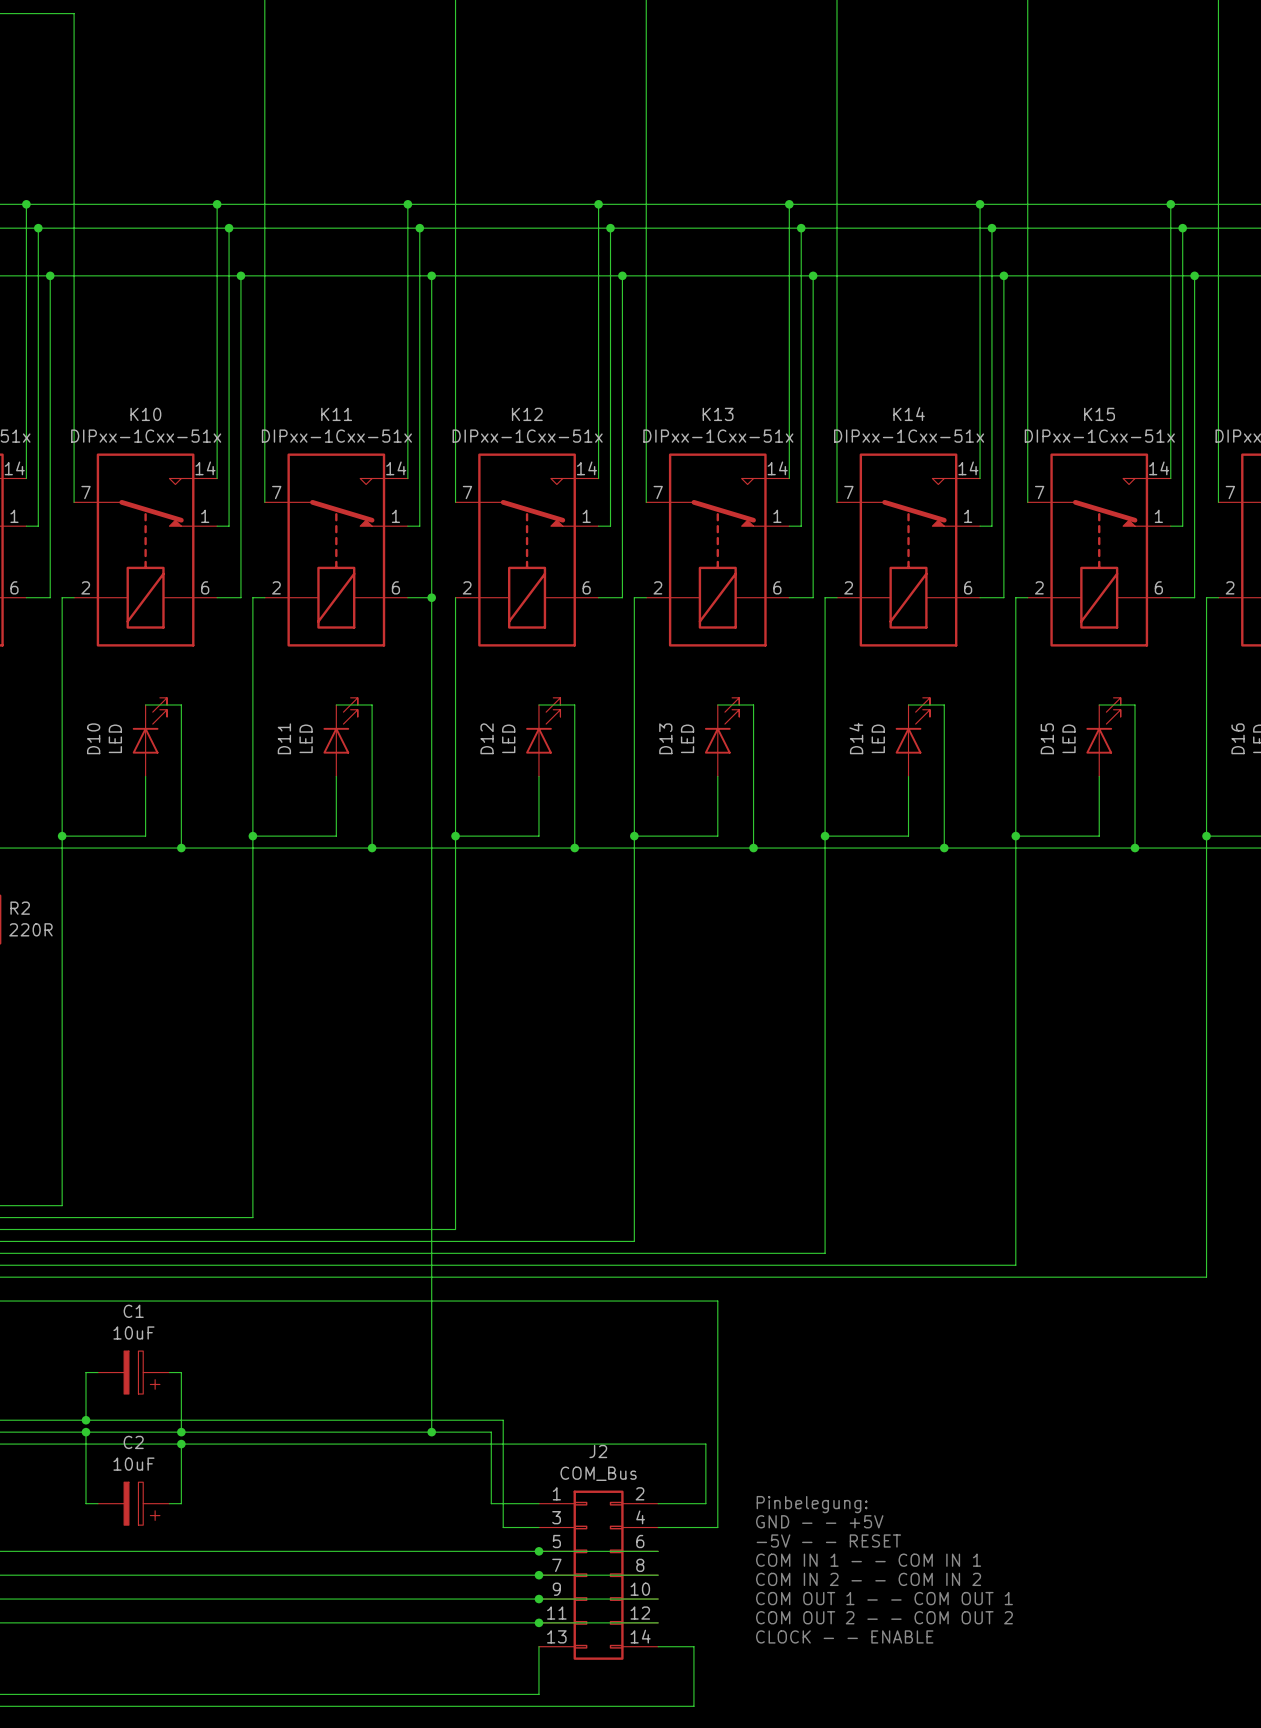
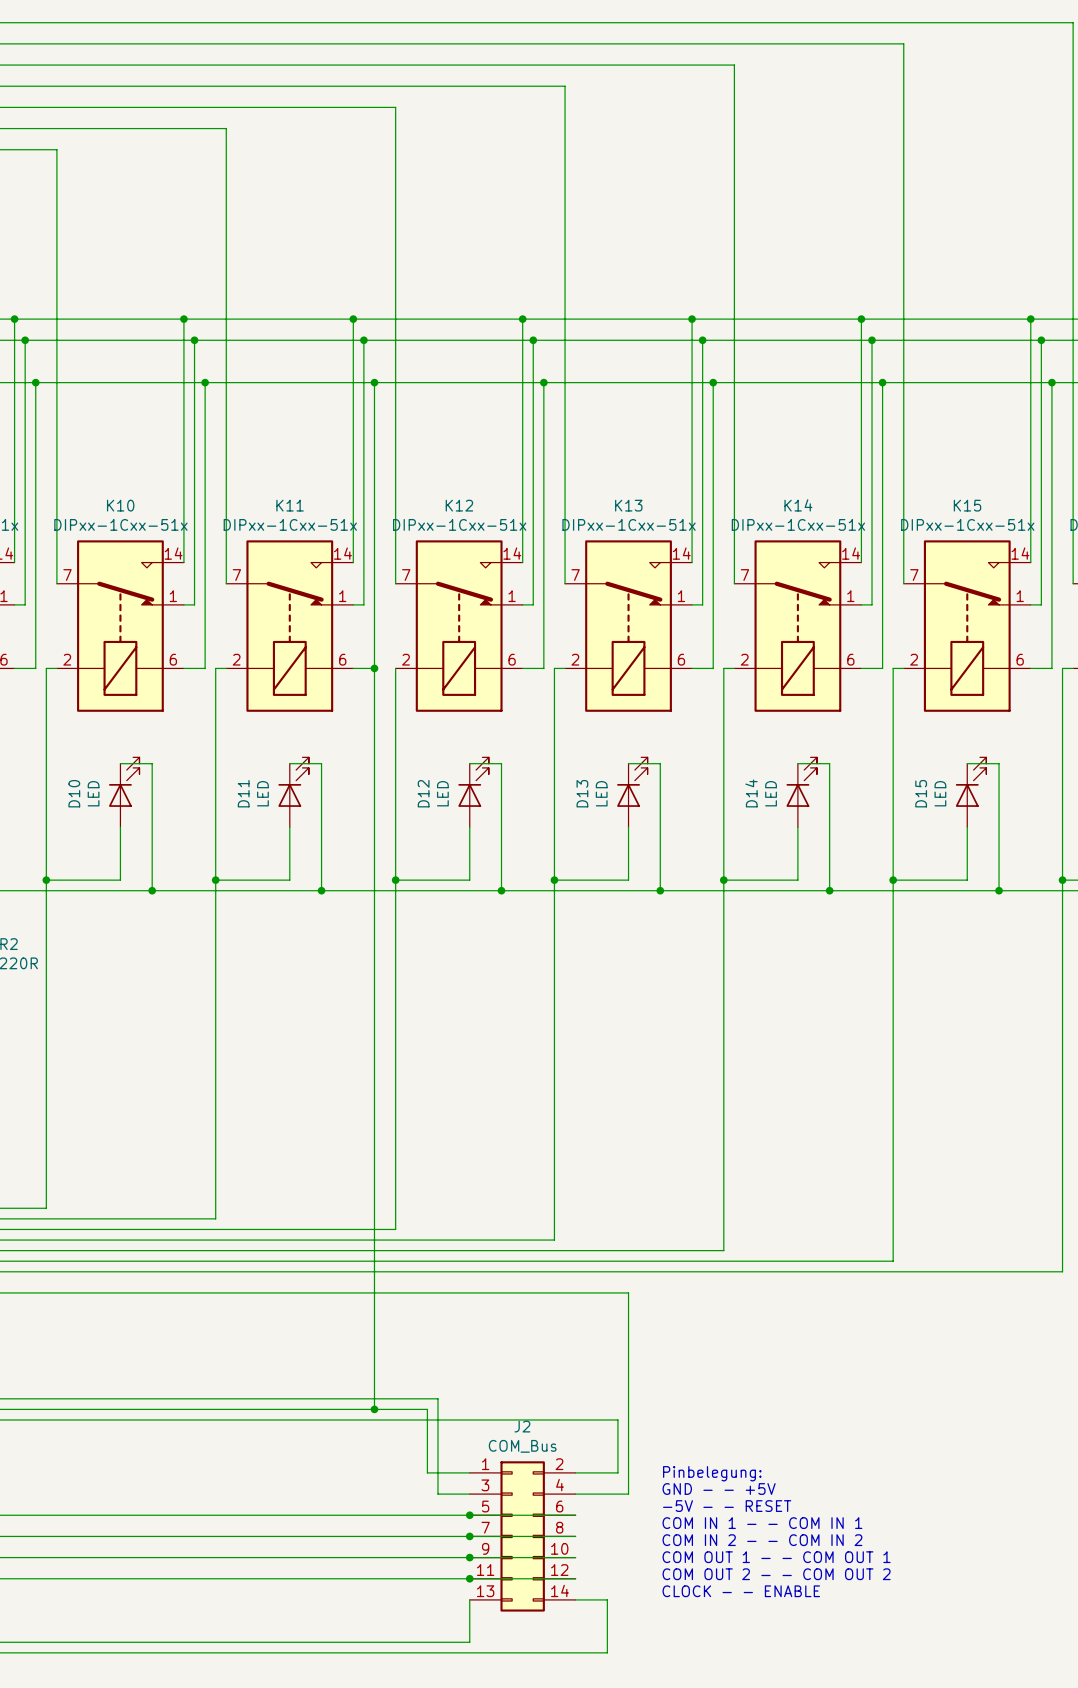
wire: (97, 1372) (86, 1372) (86, 1420) -> none
C1: 10uF (133, 1372) -> none
wire: (169, 1372) (181, 1372) (181, 1432) -> none
junction: (86, 1420) -> none
wire: (86, 1432) (86, 1503) (97, 1503) -> none
junction: (86, 1432) -> none
junction: (181, 1432) -> none
wire: (181, 1444) (181, 1503) (169, 1503) -> none
junction: (181, 1444) -> none
C2: 10uF (133, 1503) -> none

